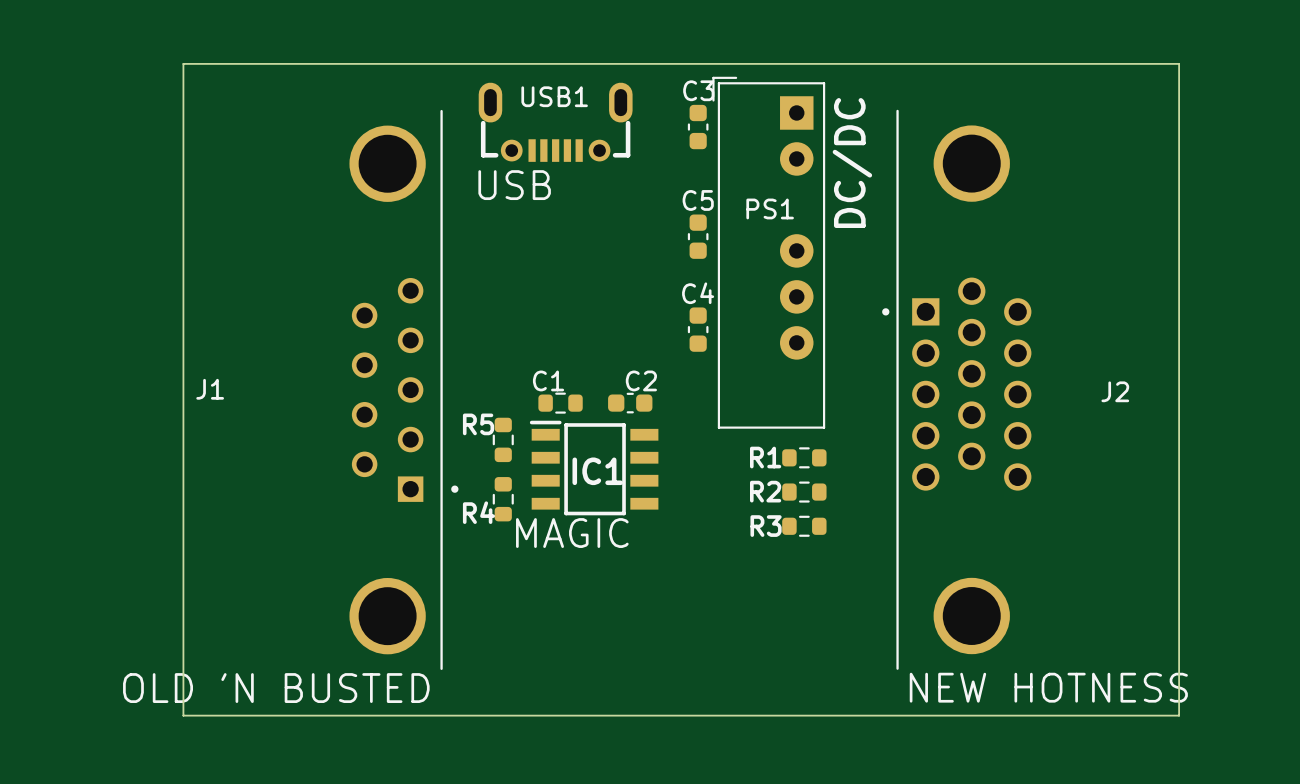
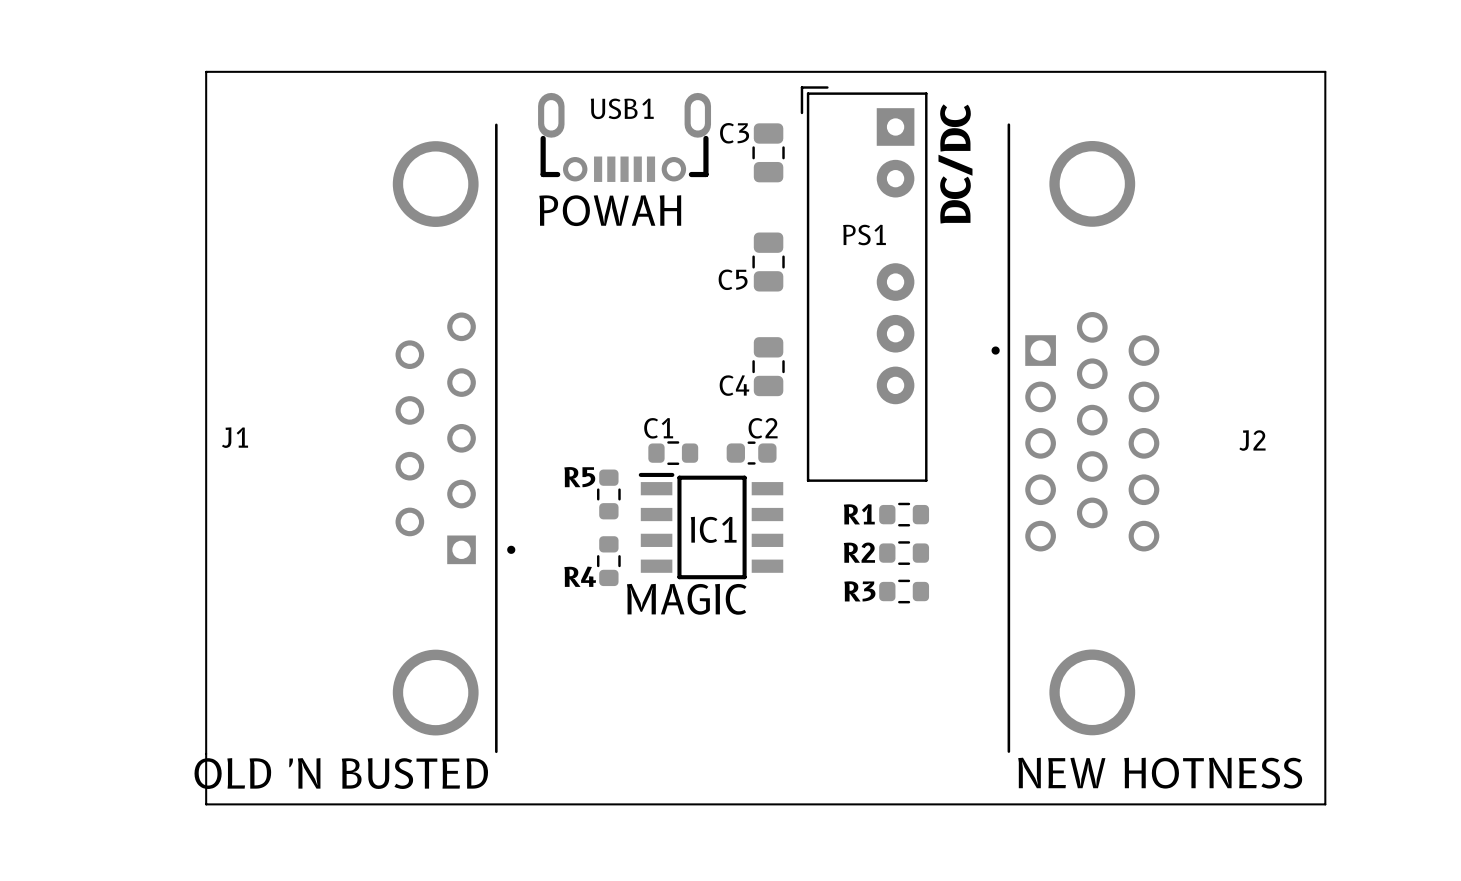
C3 footprint: [687, 104, 709, 150] -> [752, 123, 785, 183]
USB1 text: USB (514, 185) -> none
USB1 text: none -> POWAH (610, 210)
C5 name position: C5 (698, 200) -> C5 (733, 279)
C5 footprint: [687, 214, 709, 259] -> [752, 232, 785, 292]
C4 name position: C4 (698, 293) -> C4 (734, 385)
C4 footprint: [687, 307, 709, 352] -> [752, 337, 785, 397]
C1 position: (560, 403) -> (673, 453)
C2 position: (630, 403) -> (751, 453)
R5 position: (503, 439) -> (608, 494)
IC1 position: (594, 468) -> (711, 526)
R4 position: (503, 499) -> (608, 561)

